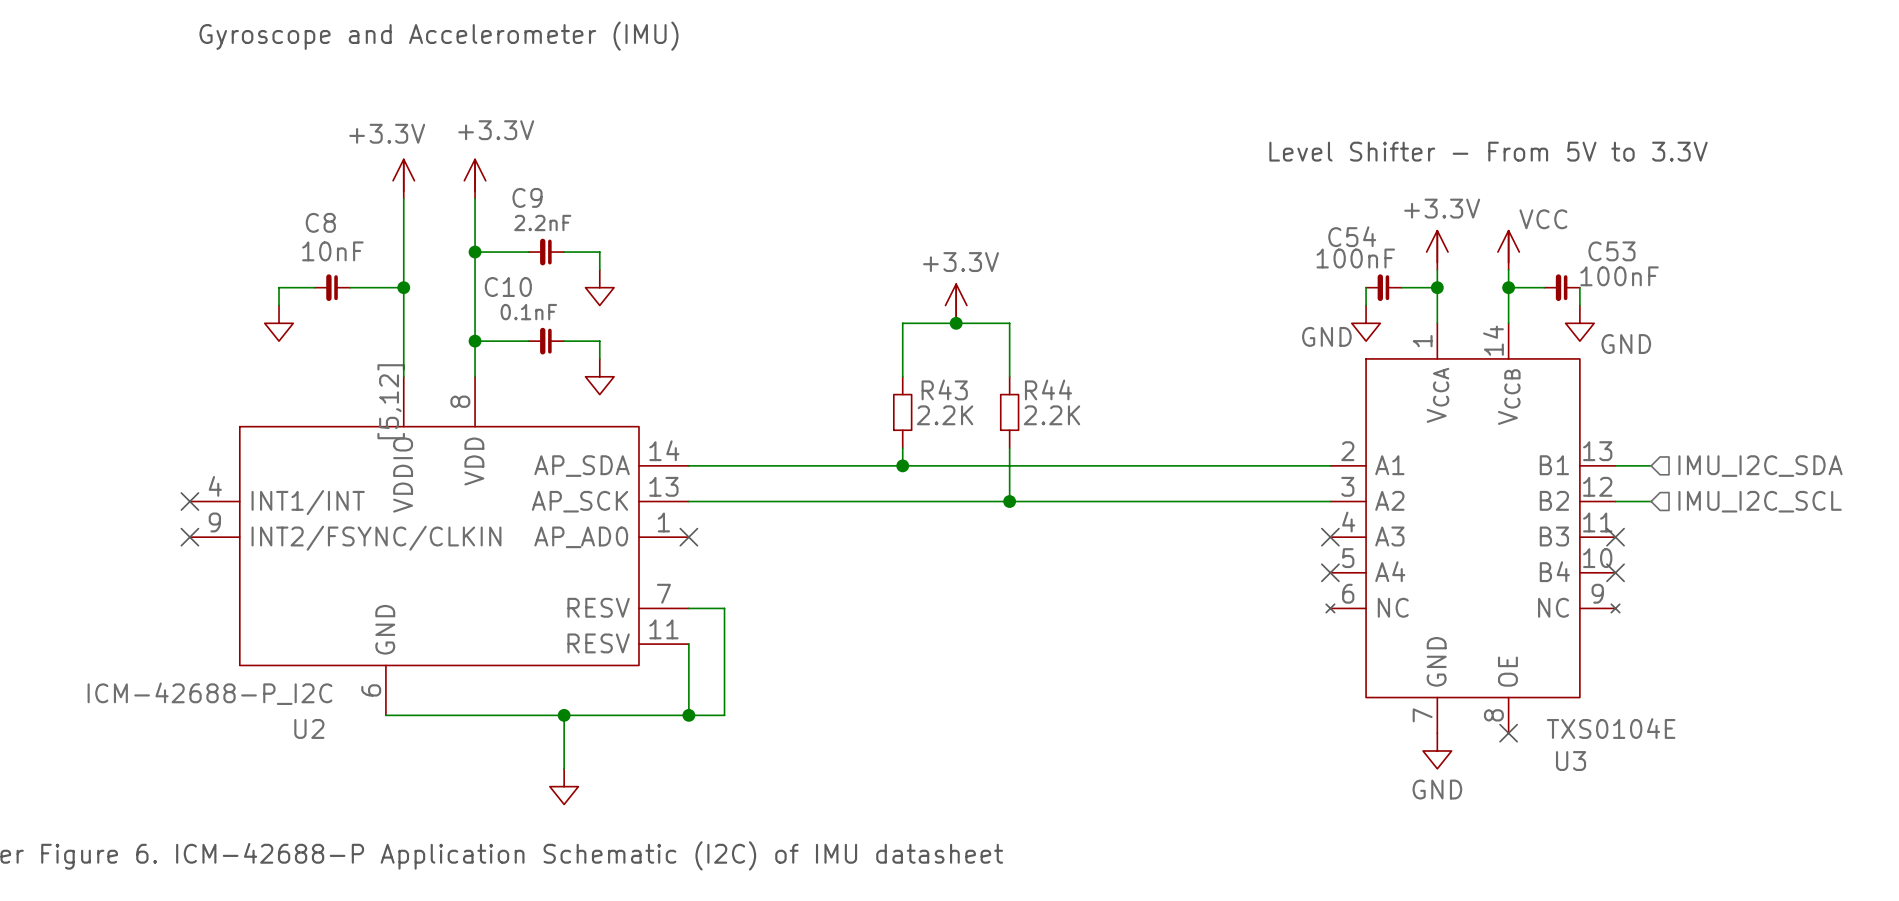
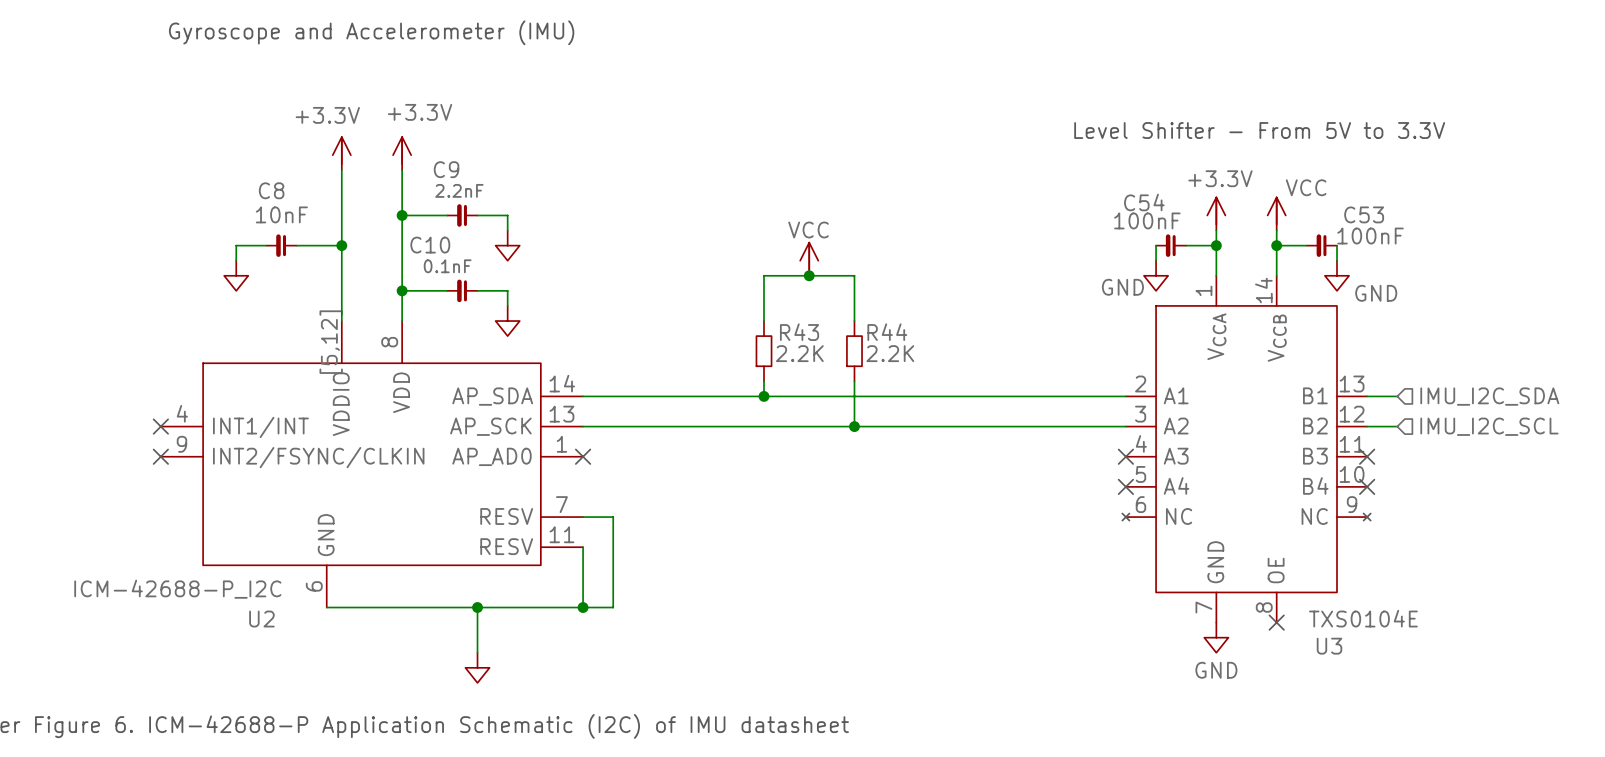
power symbol: +3.3V (956, 303) -> VCC (809, 259)

